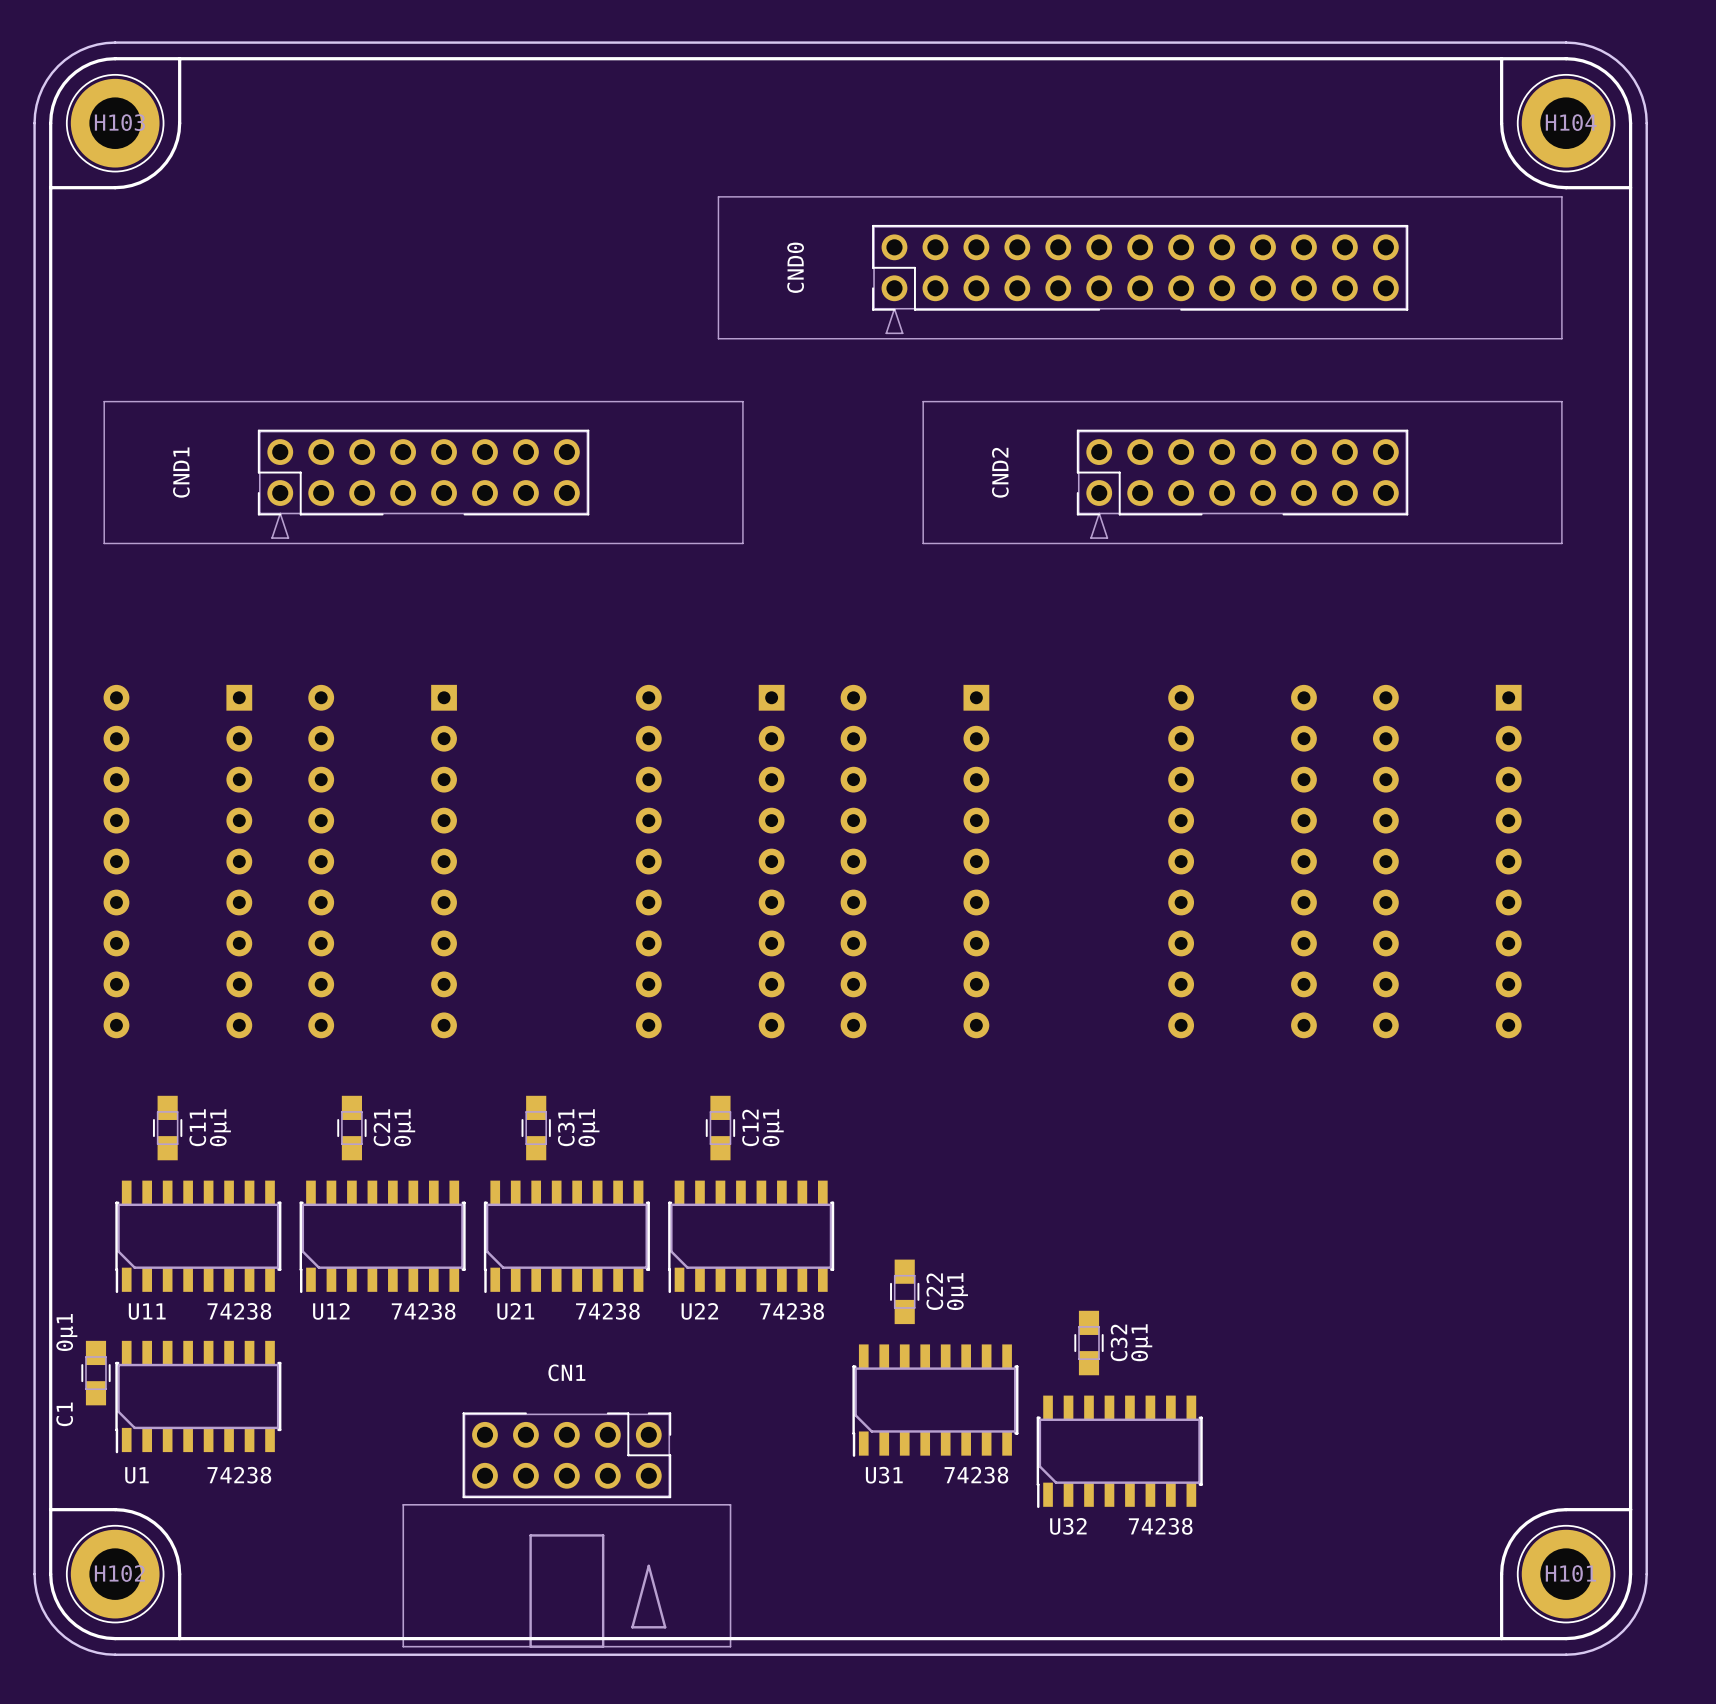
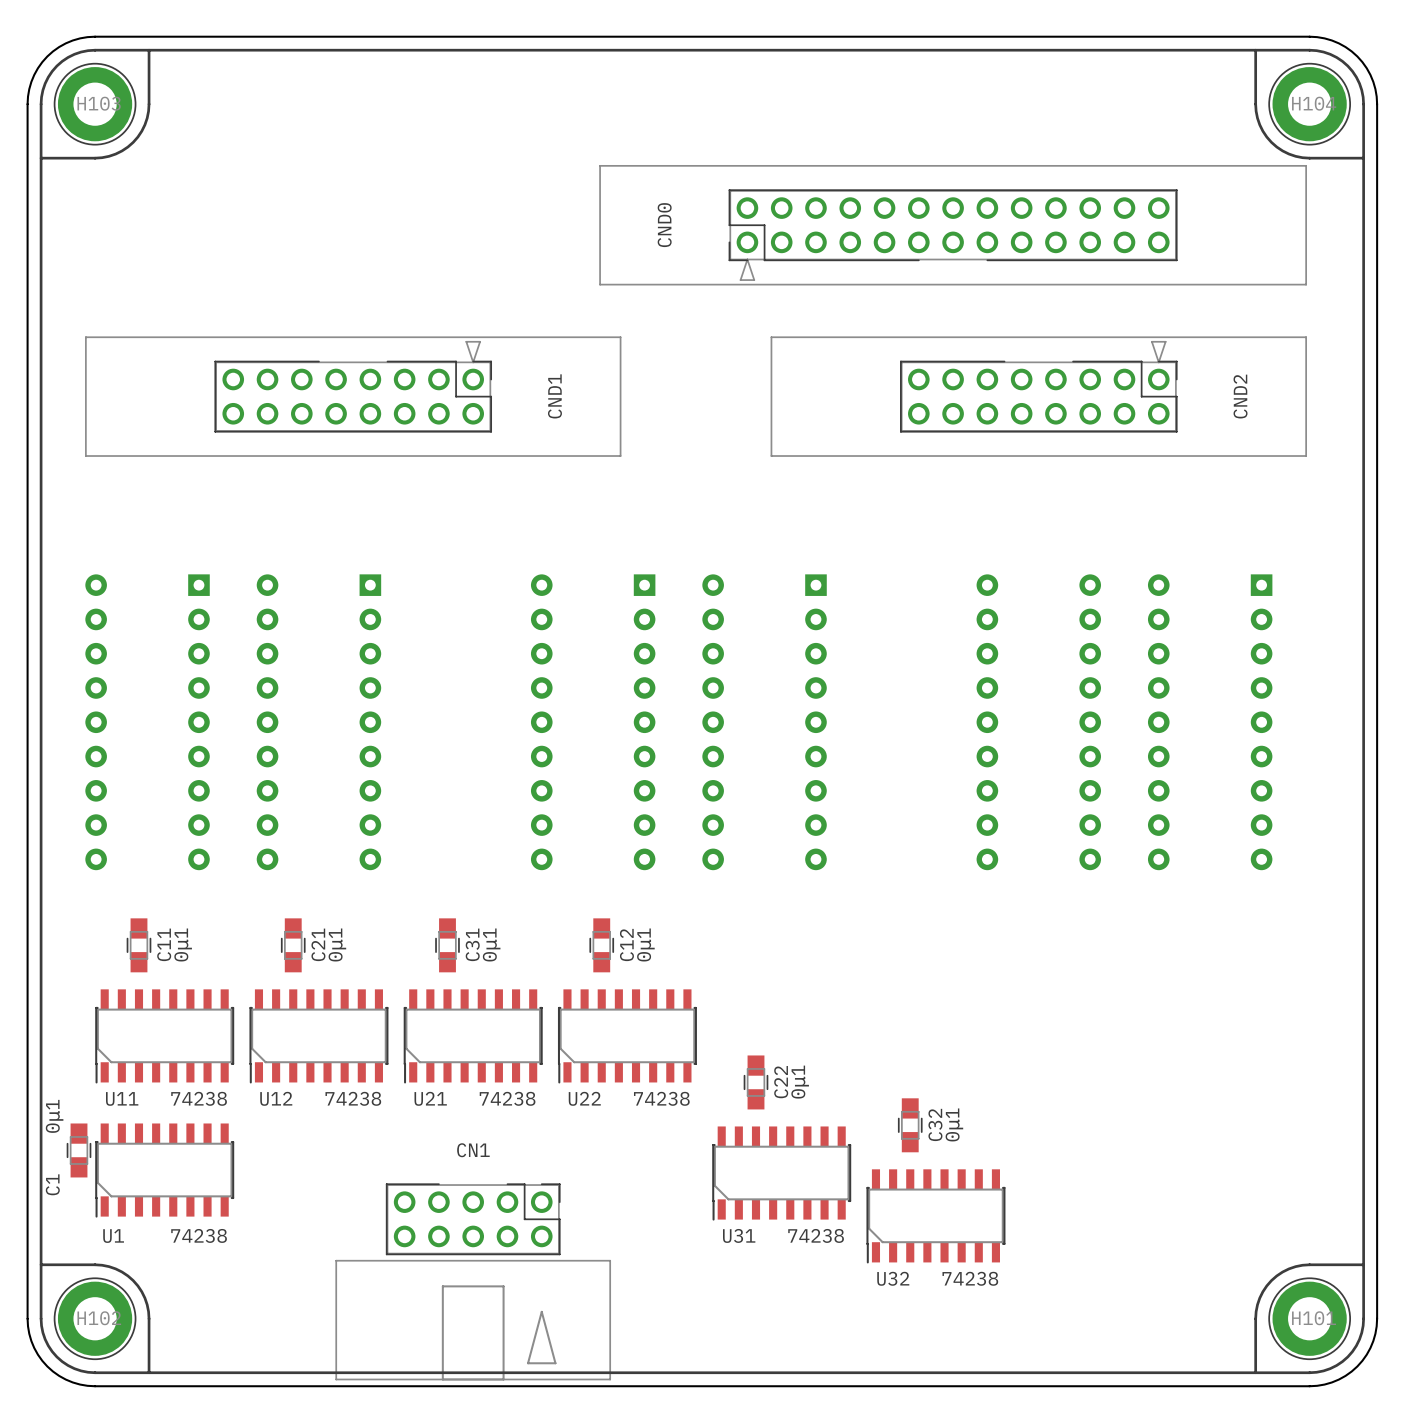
CND1 rotation: 0° (423, 472) -> 180° (353, 396)
CND2 rotation: 0° (1242, 472) -> 180° (1038, 396)

